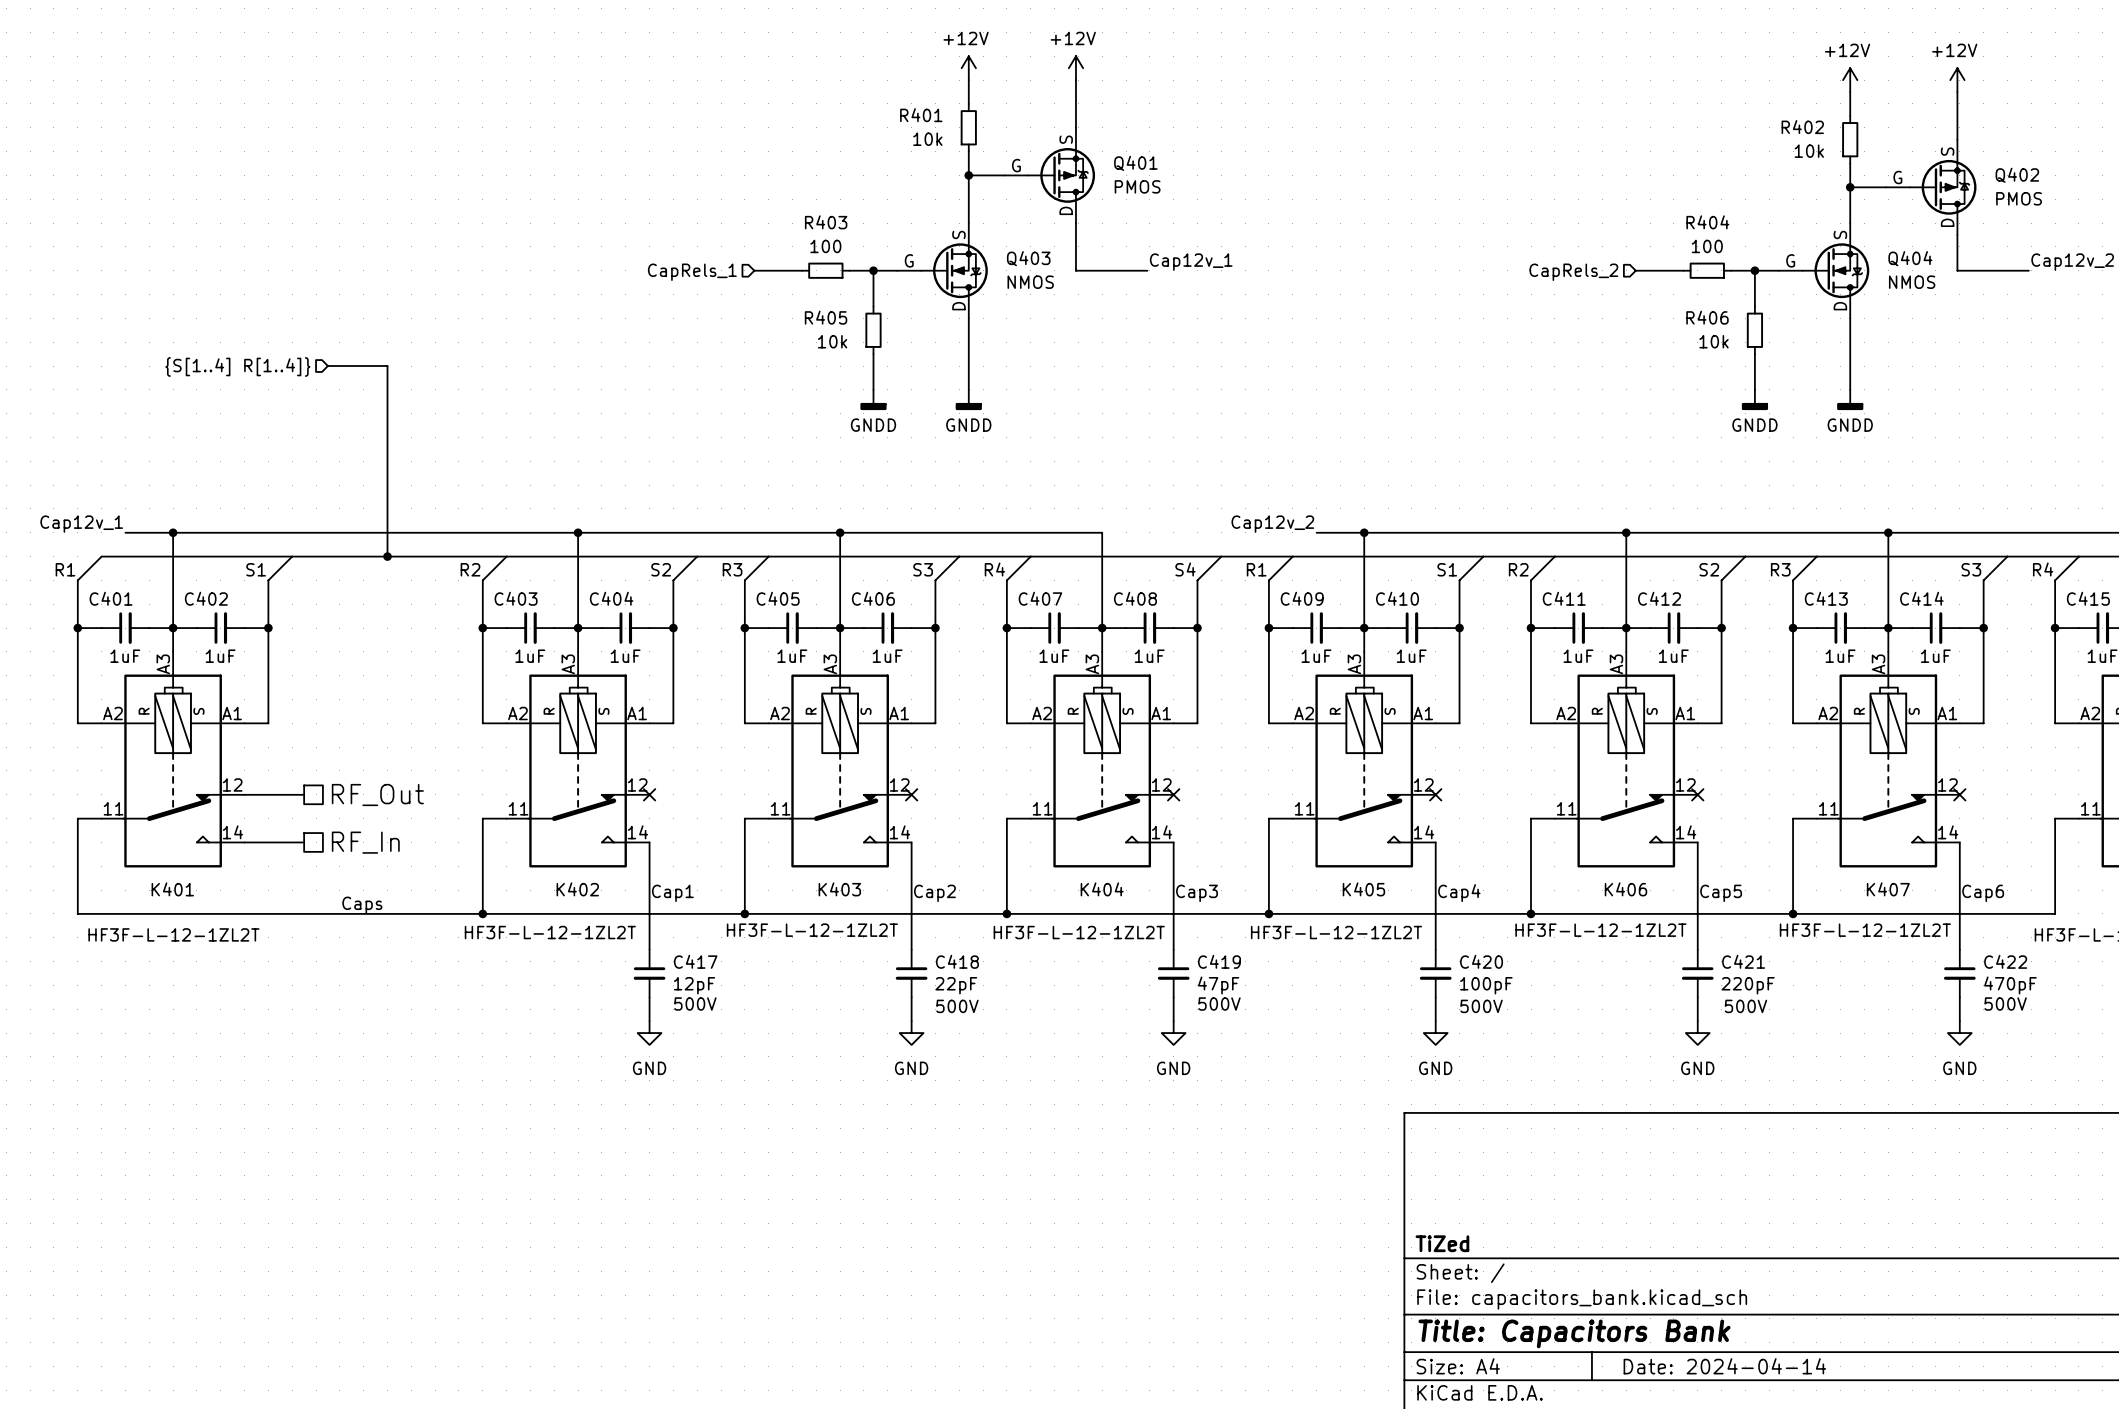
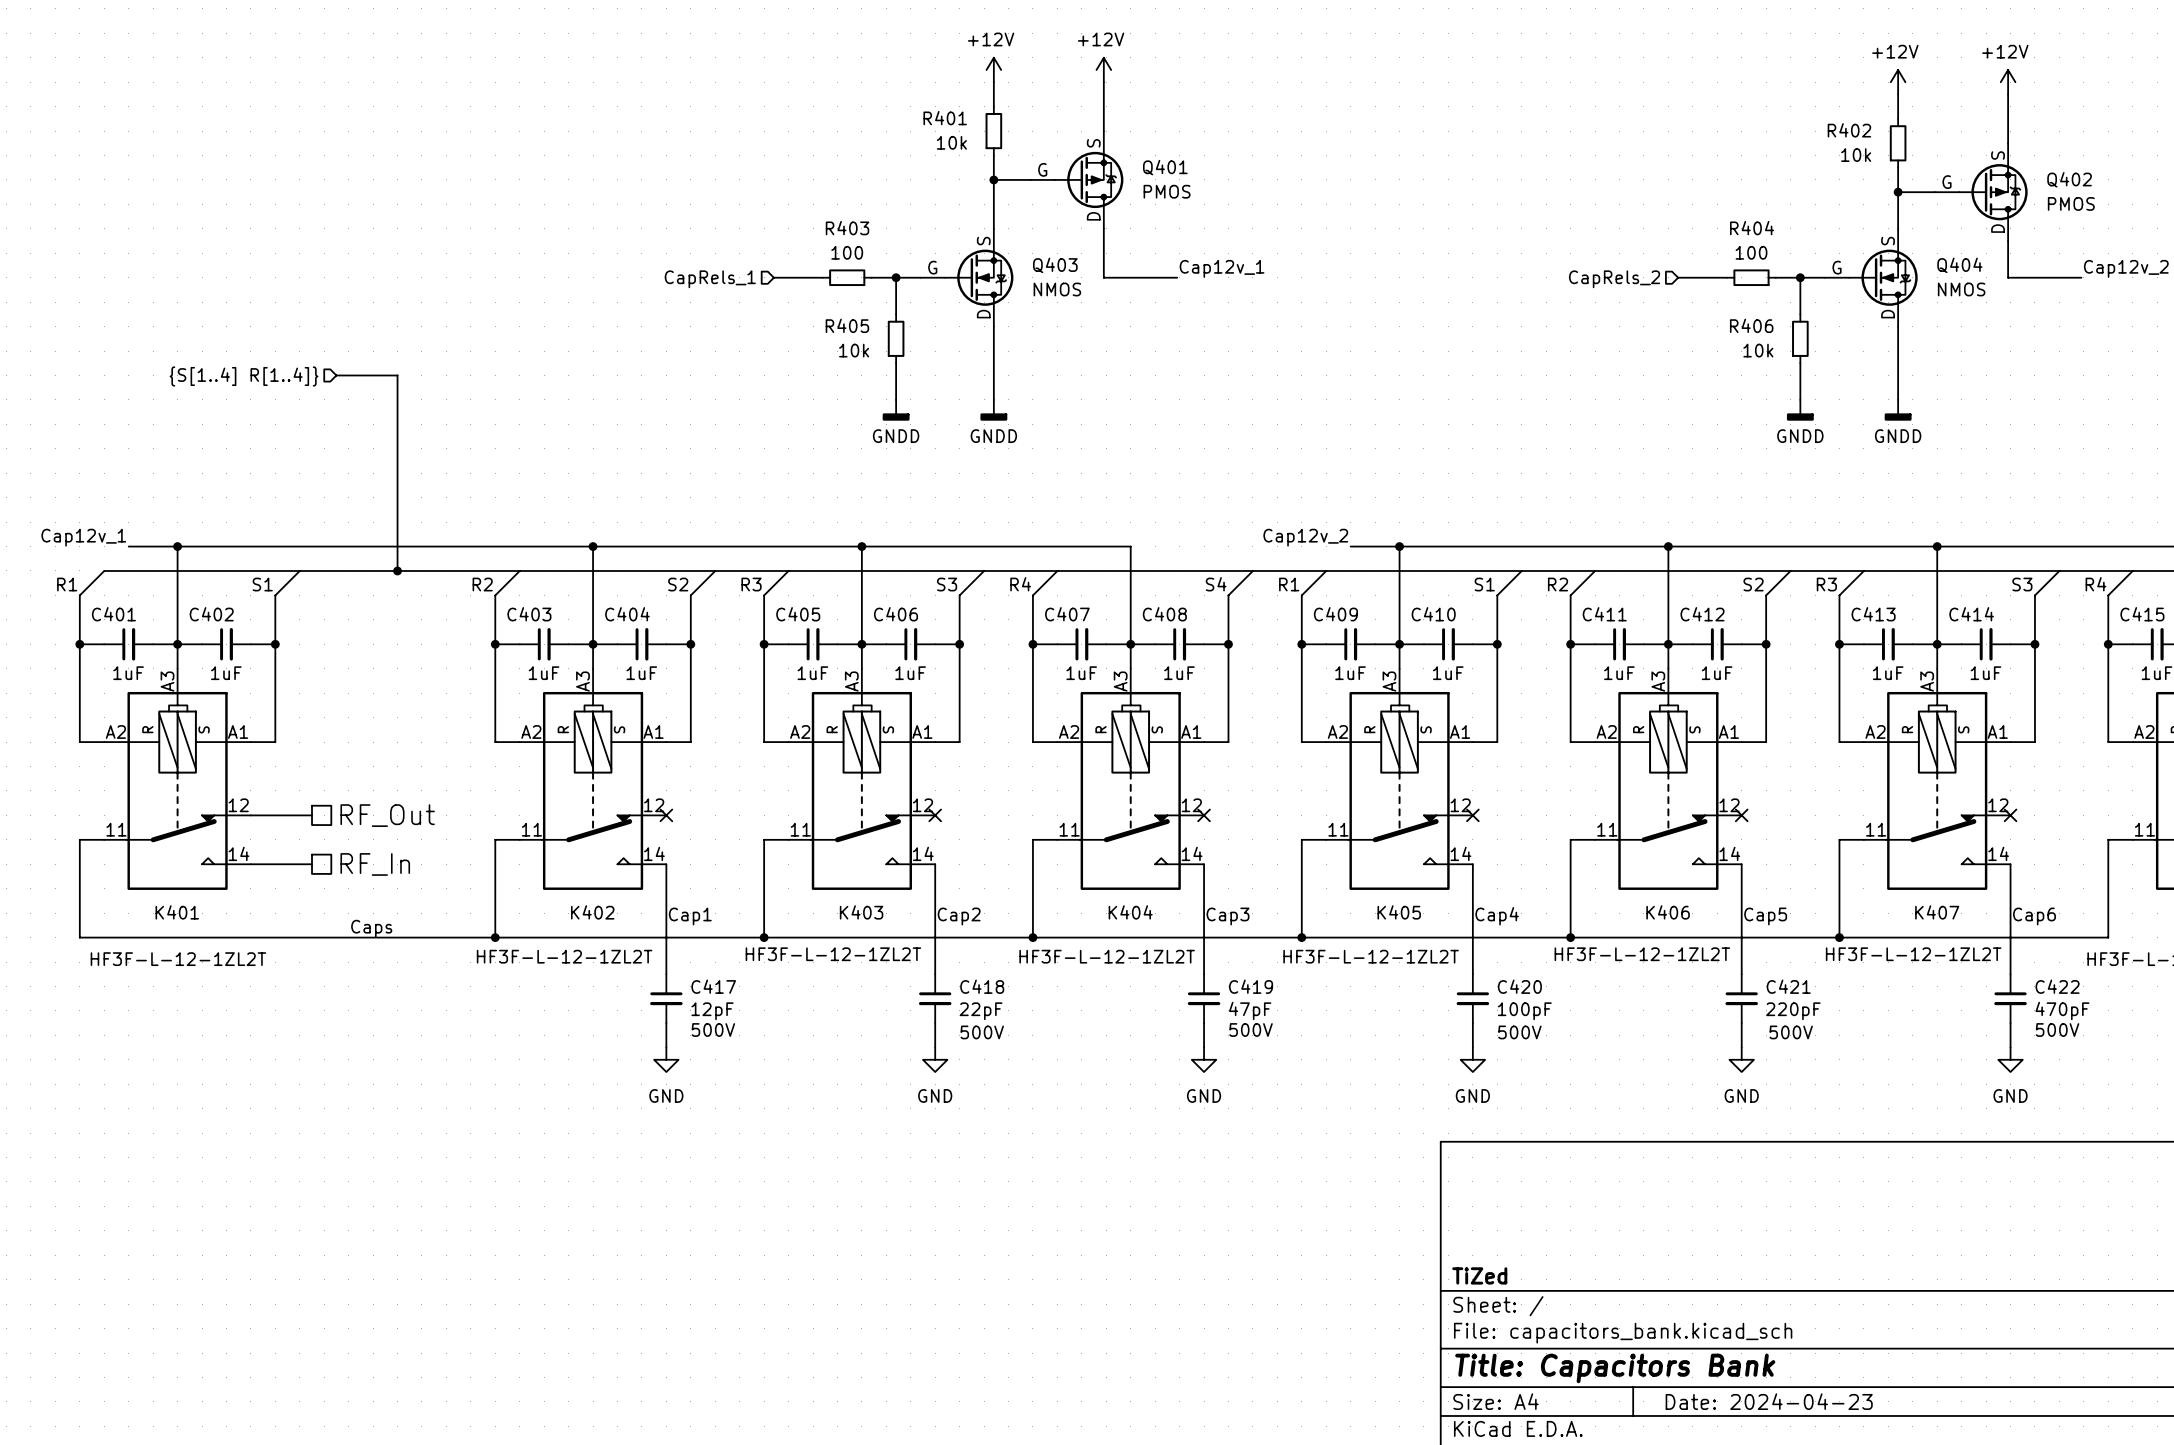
title block: Date: 2024-04-14 (1724, 1366) -> Date: 2024-04-23 (1769, 1401)

